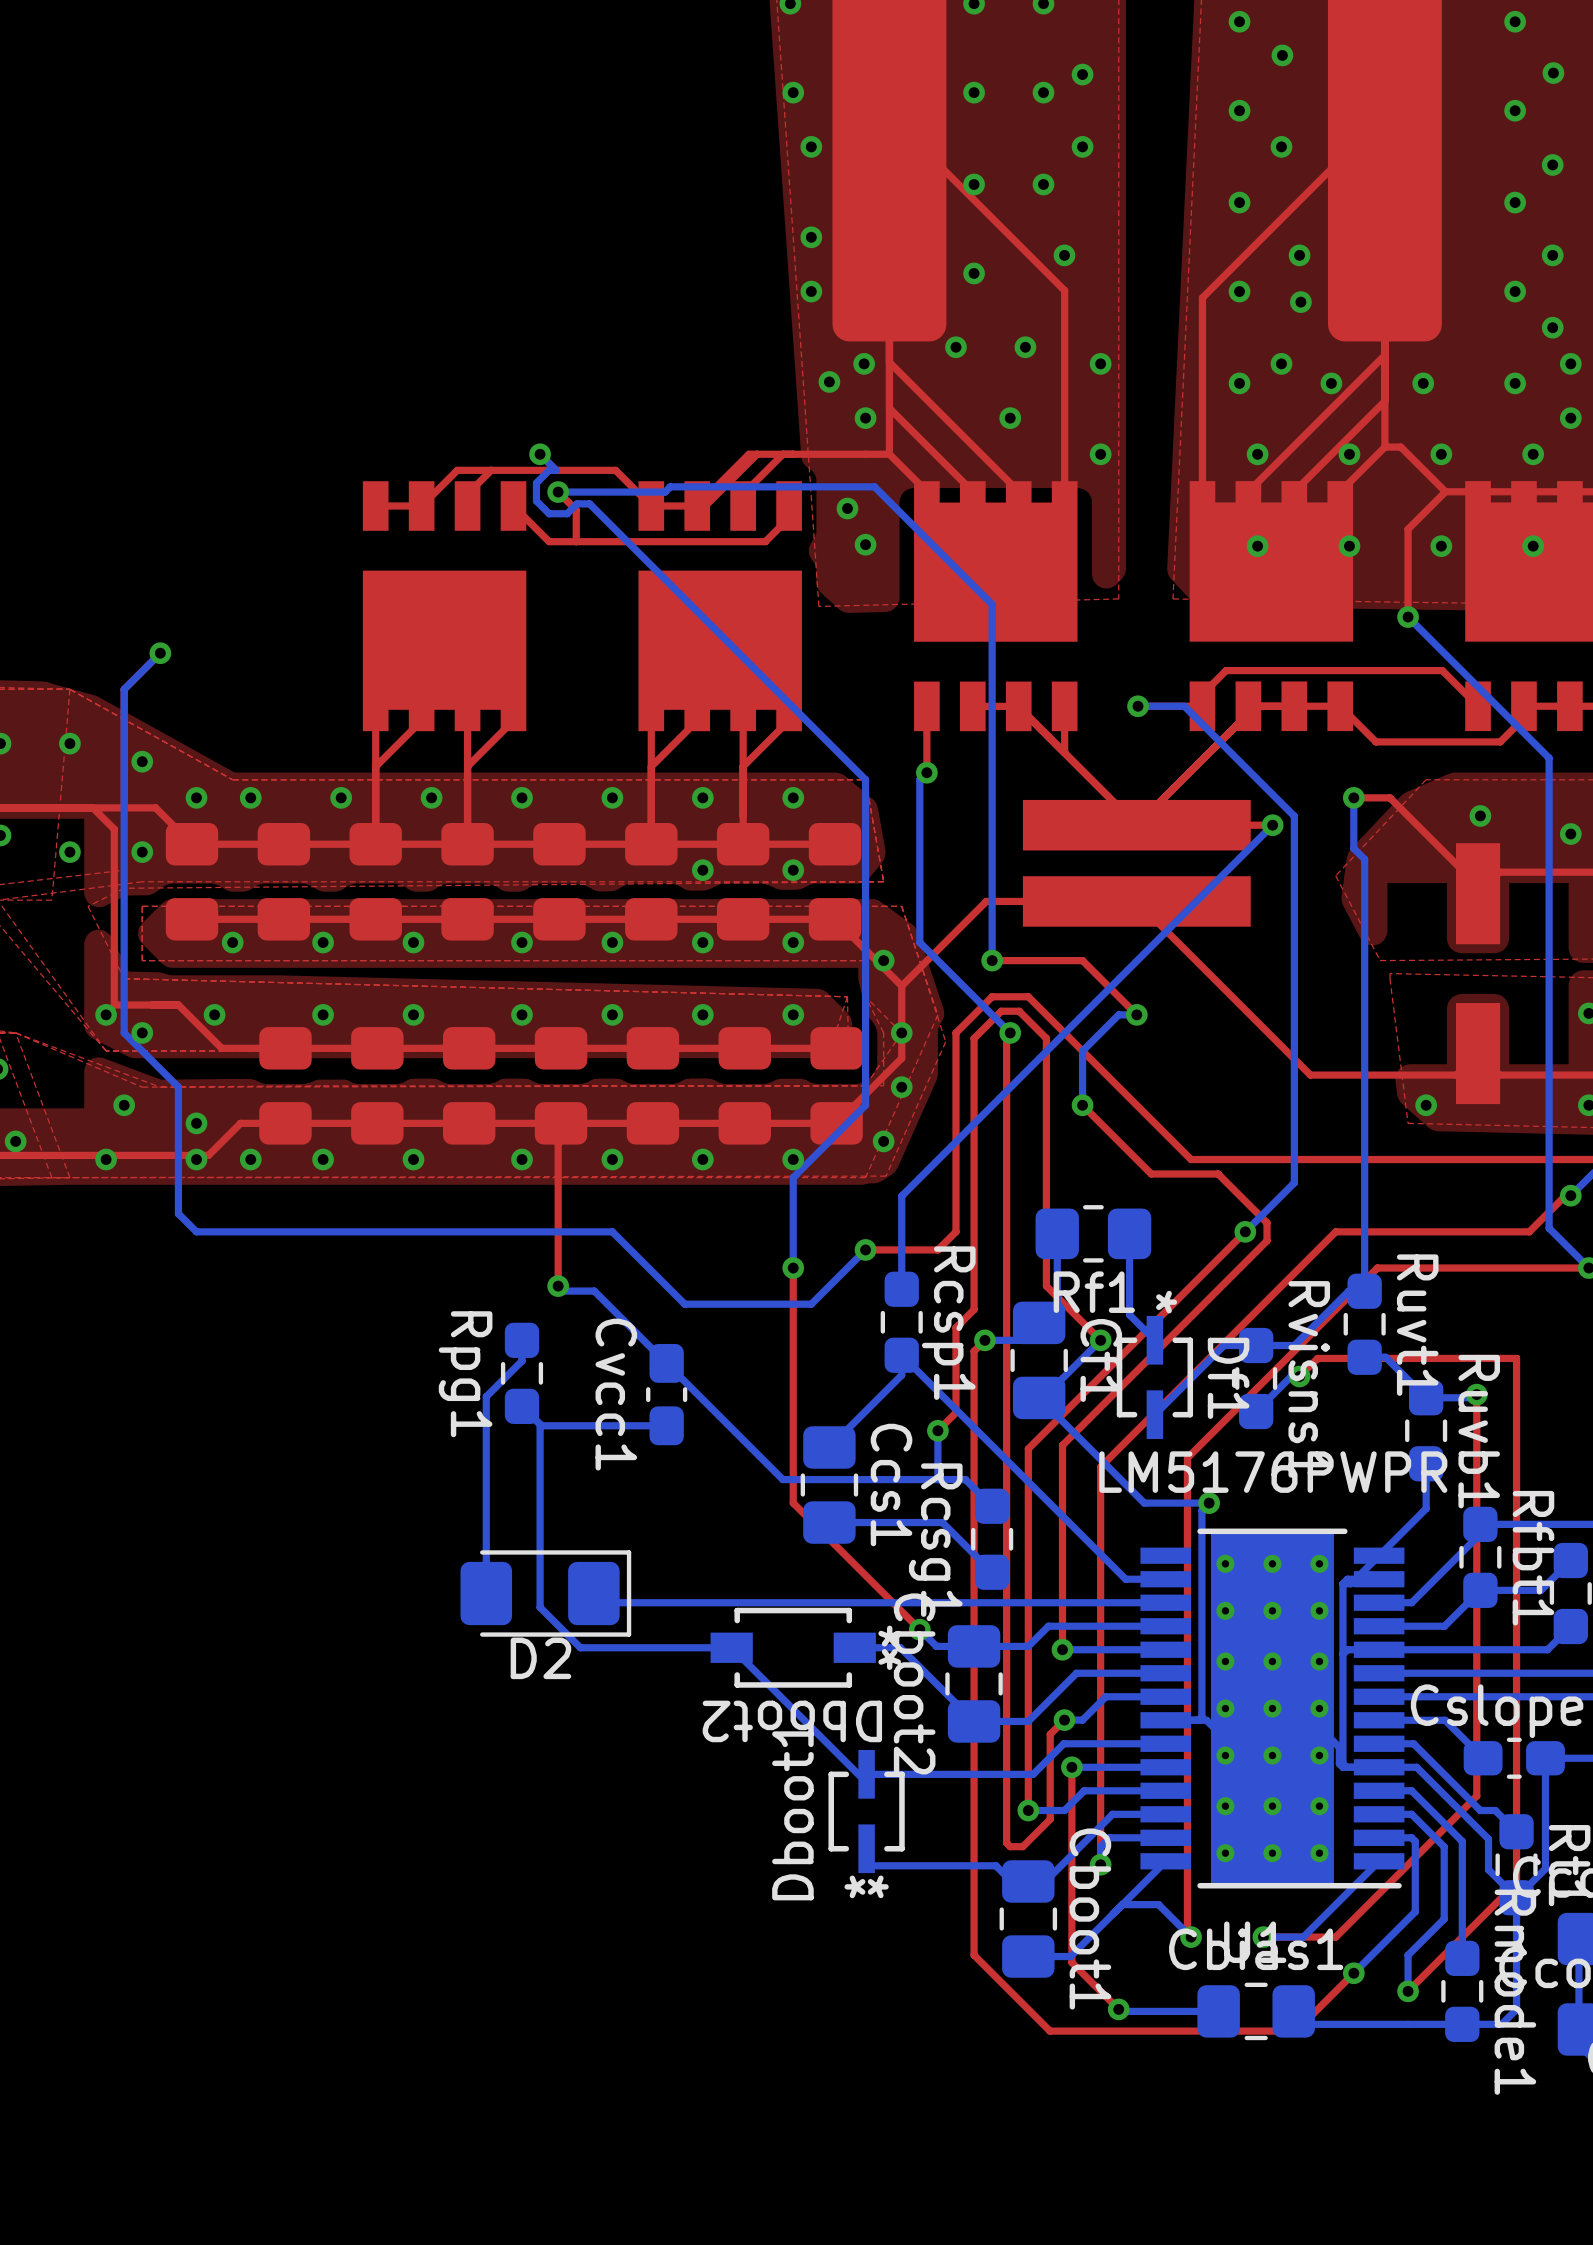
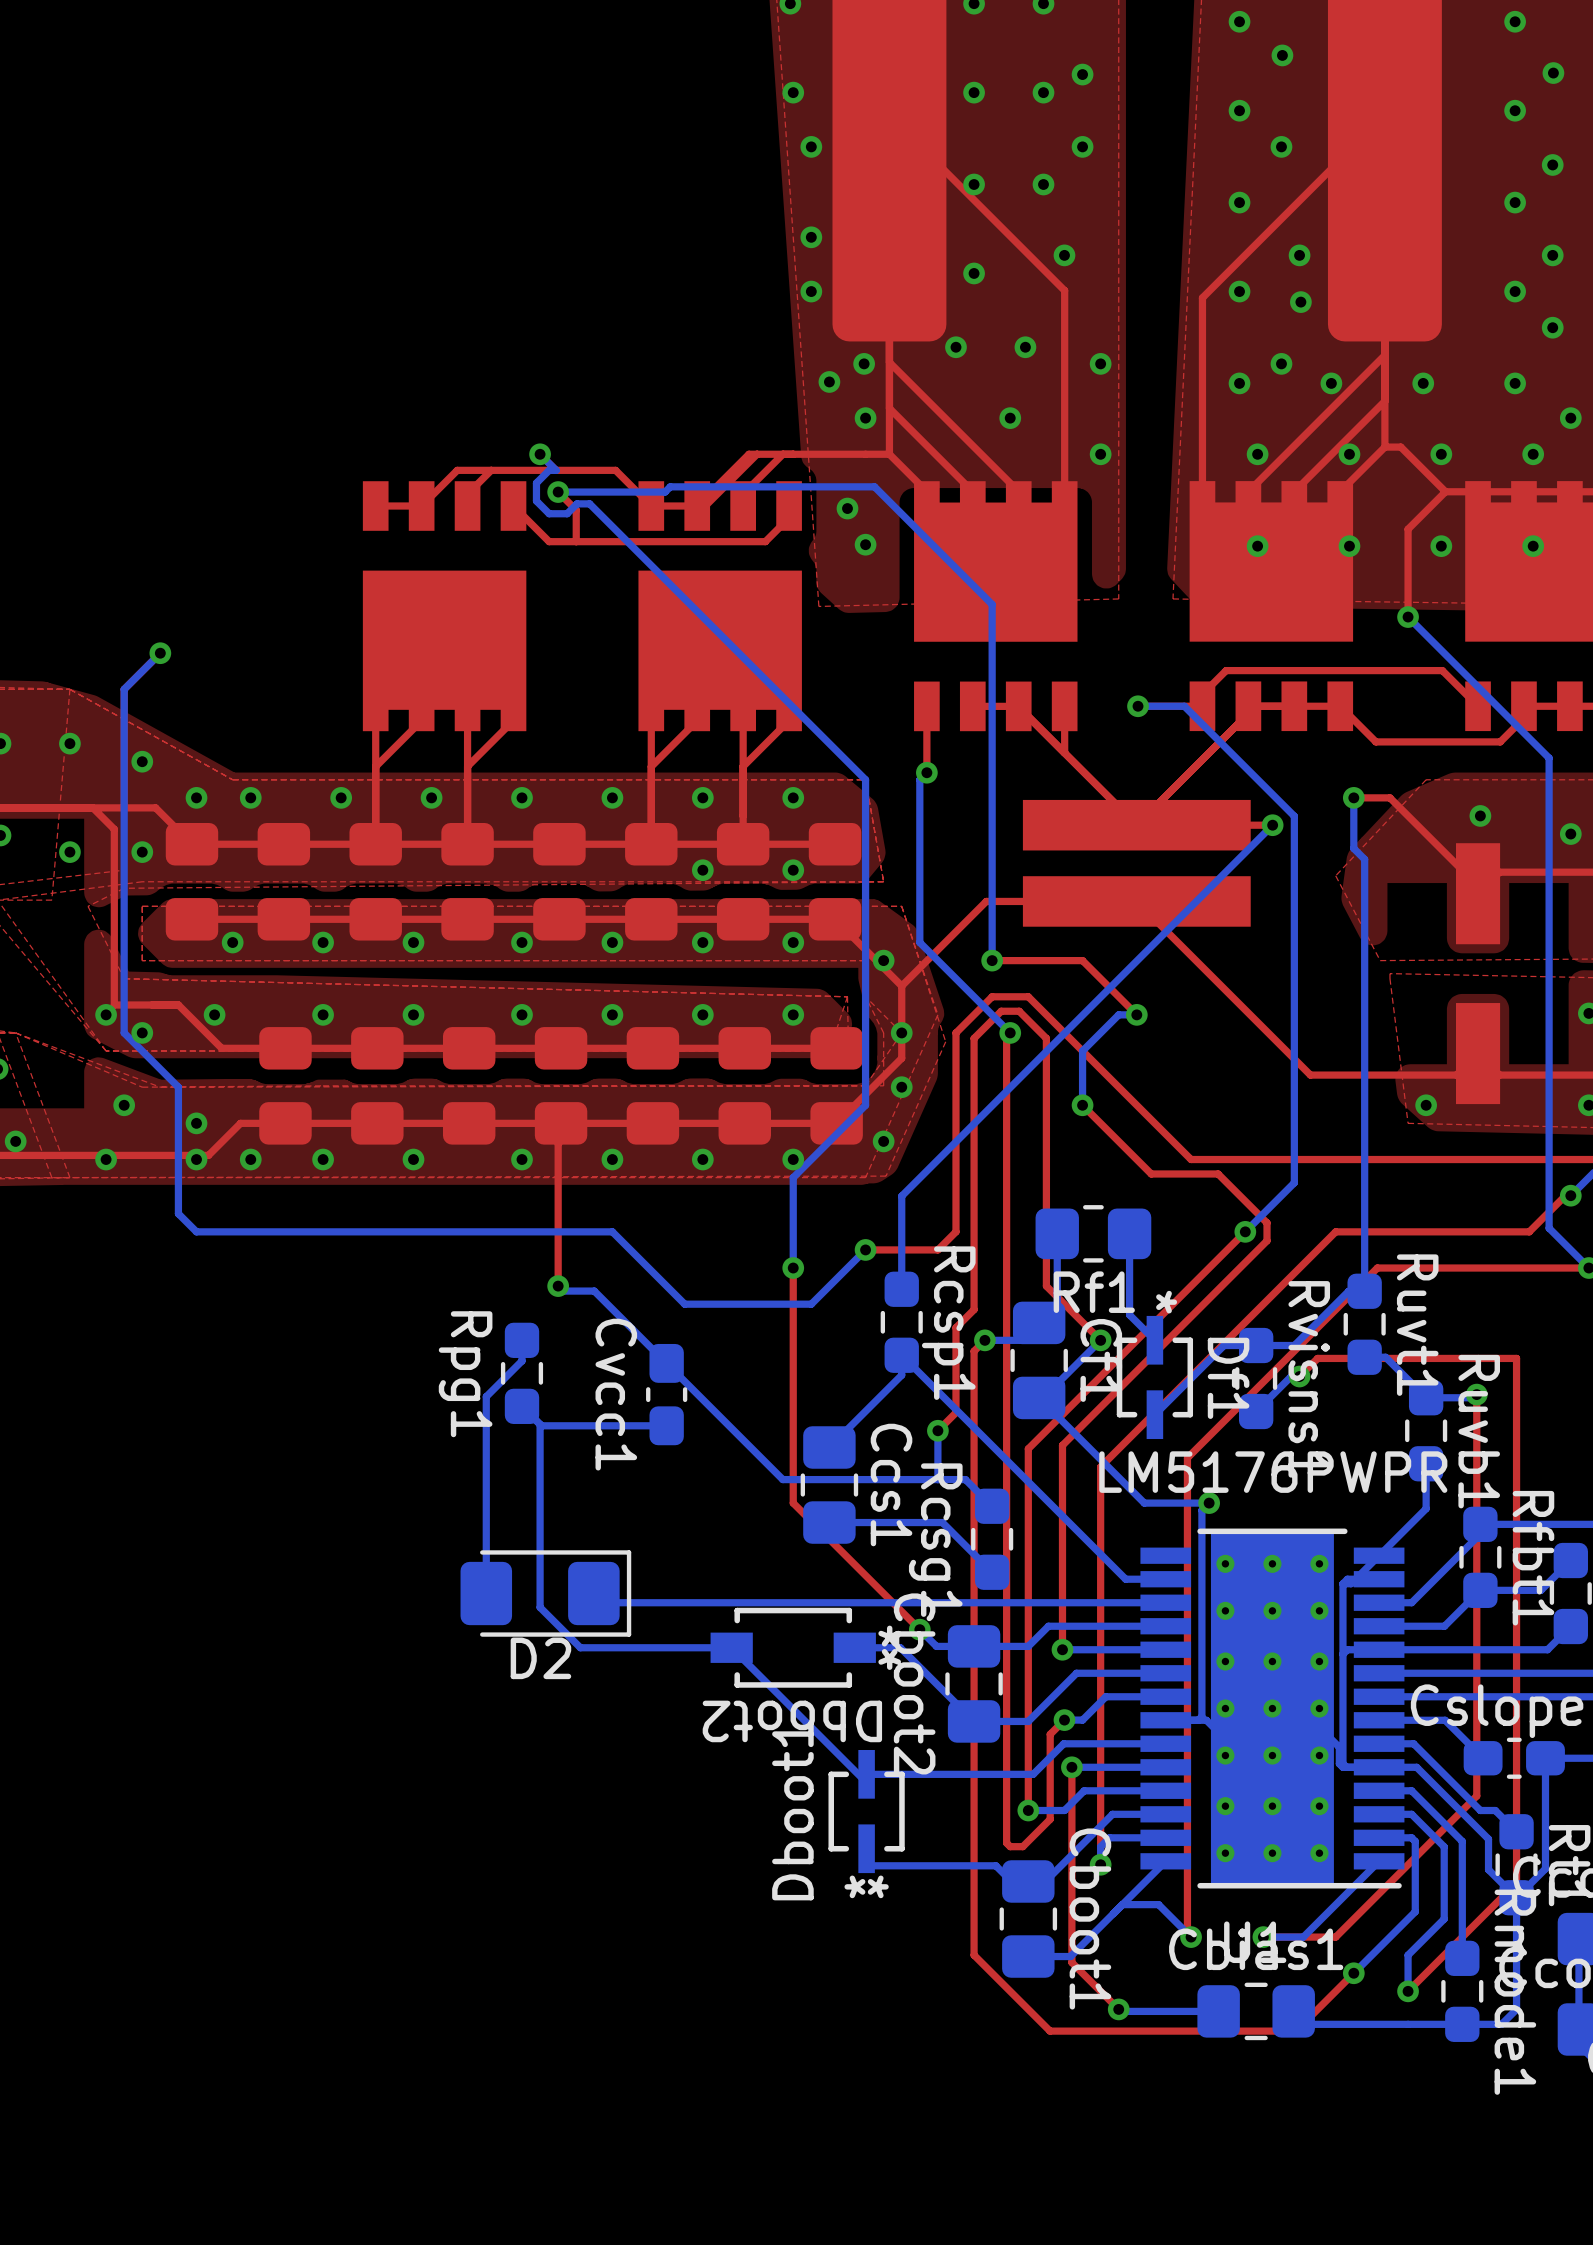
via: (1570, 363) -> none

